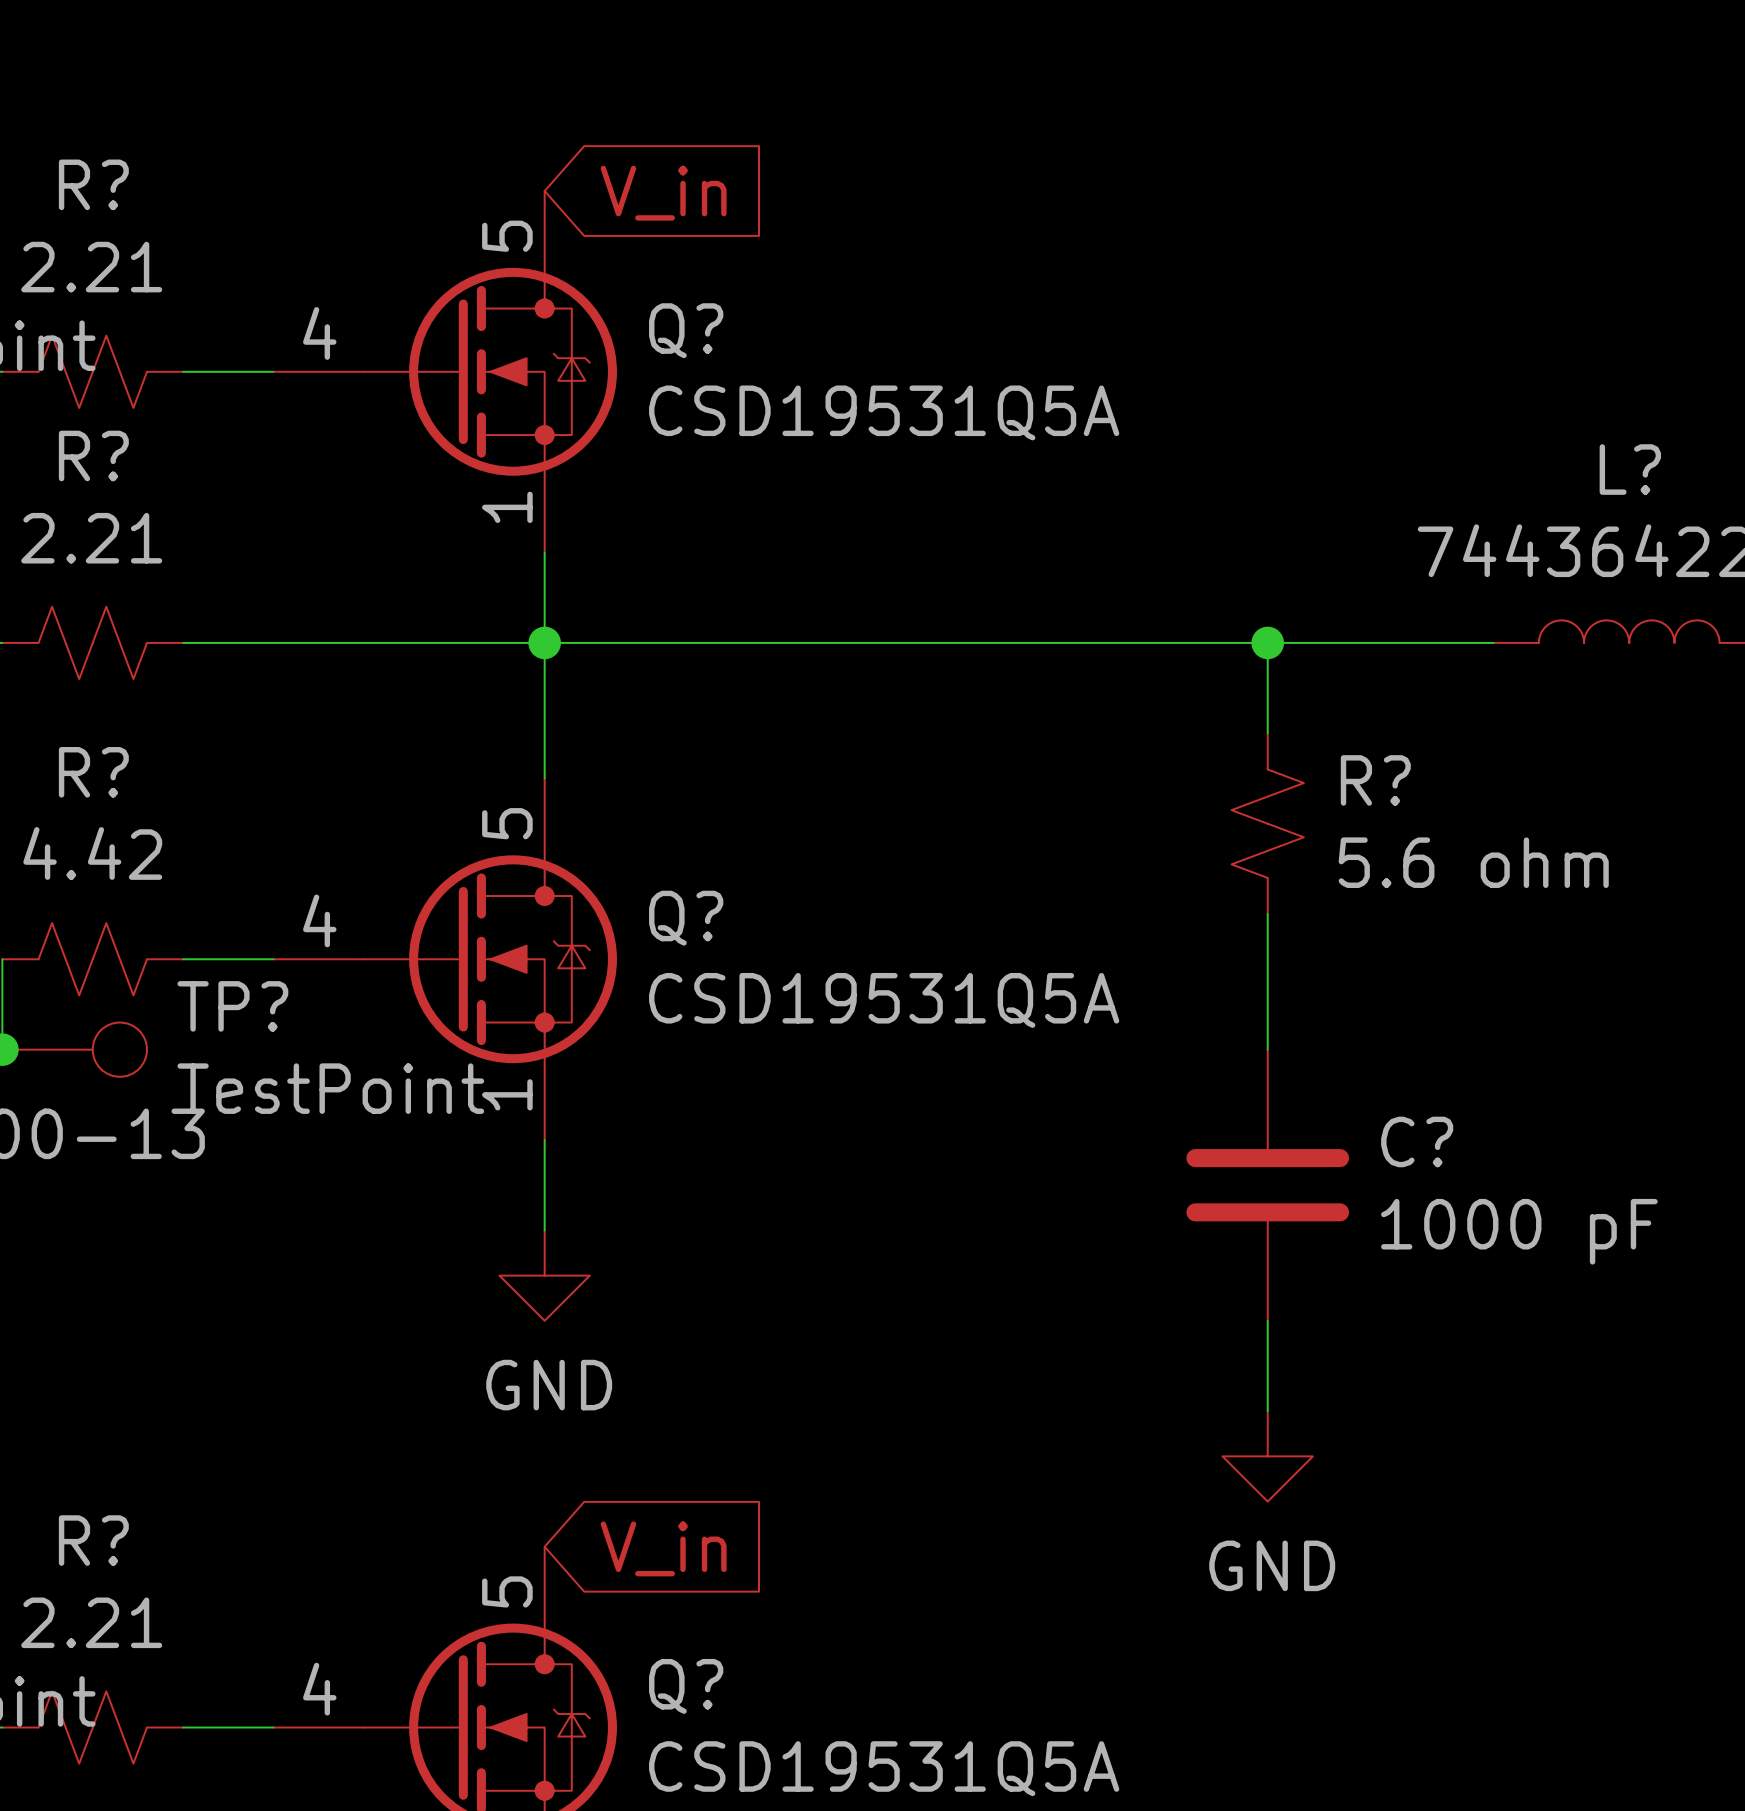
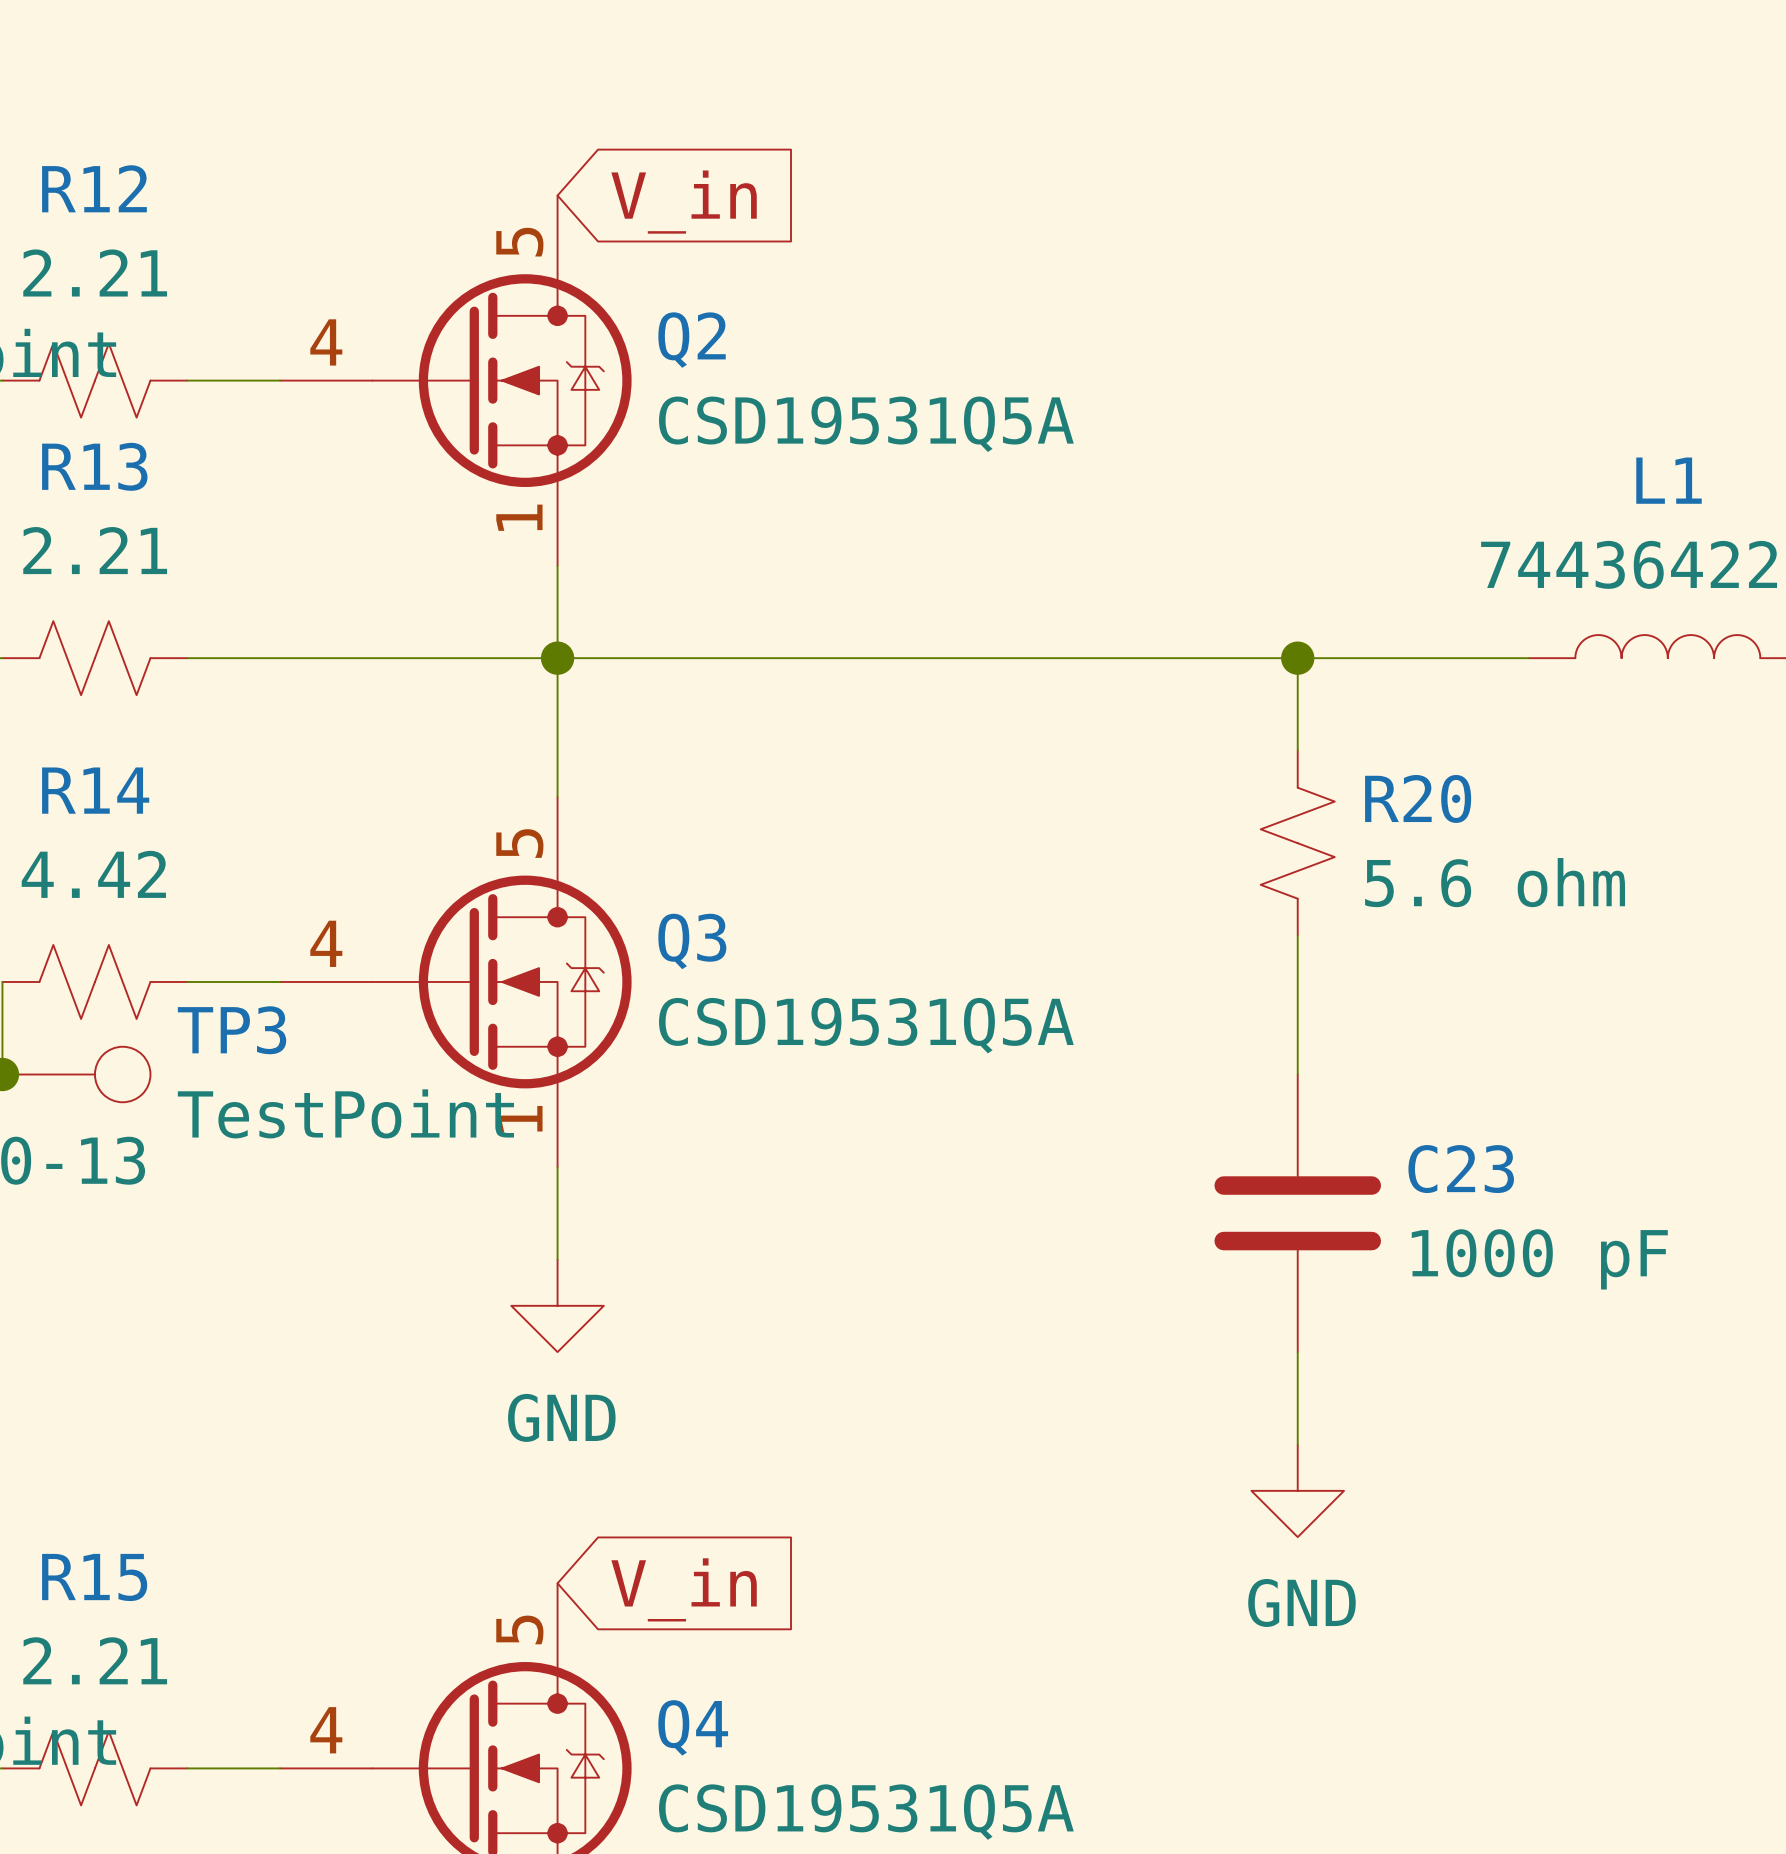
R? name: R? (93, 184) -> R12 (94, 188)
Q? name: Q? (686, 330) -> Q2 (692, 340)
R? name: R? (93, 455) -> R13 (94, 466)
L? name: L? (1630, 469) -> L1 (1669, 480)
R? name: R? (93, 772) -> R14 (95, 790)
R? name: R? (1375, 780) -> R20 (1418, 798)
Q? name: Q? (686, 918) -> Q3 (692, 941)
TP? name: TP? (232, 1006) -> TP3 (232, 1030)
C? name: C? (1417, 1141) -> C23 (1461, 1169)
R? name: R? (93, 1540) -> R15 (94, 1577)
Q? name: Q? (686, 1686) -> Q4 (693, 1727)

